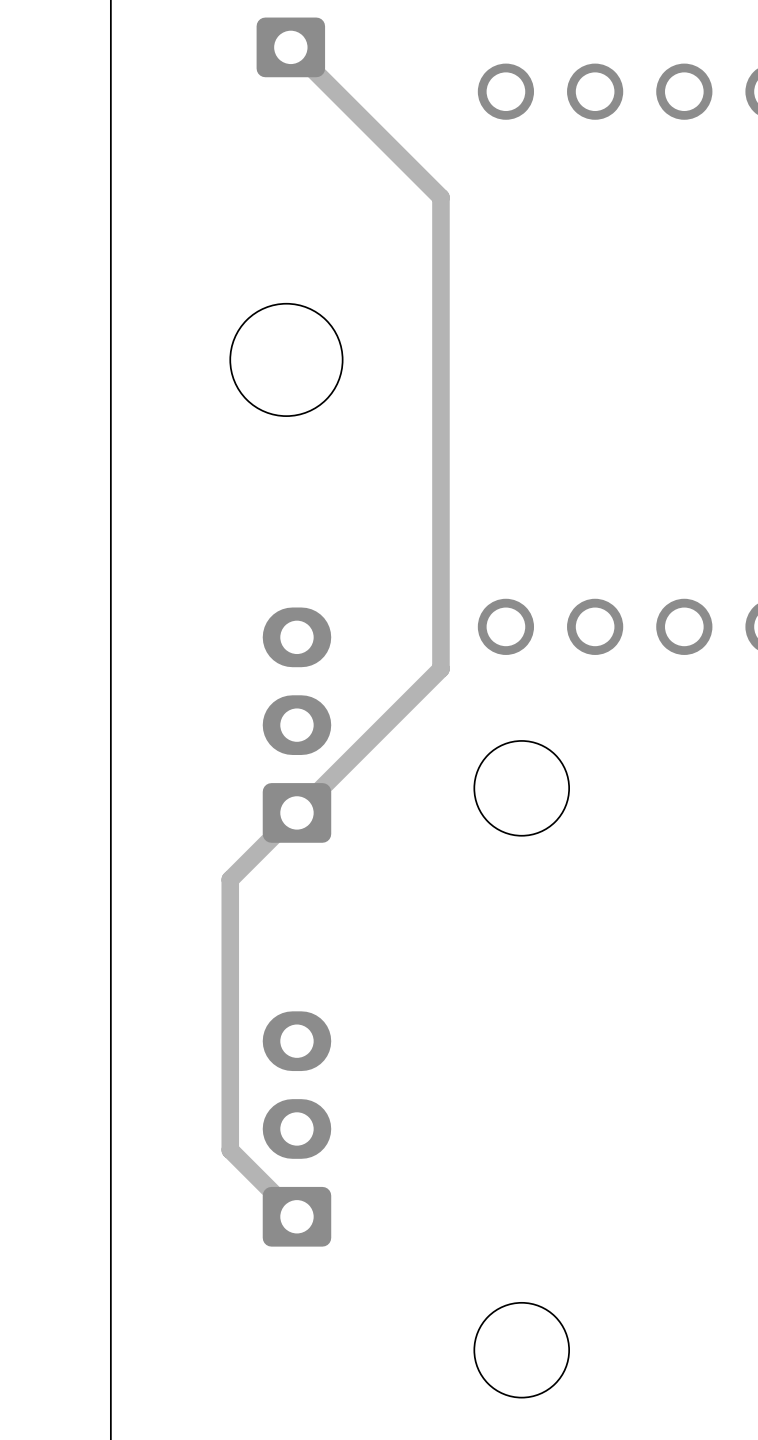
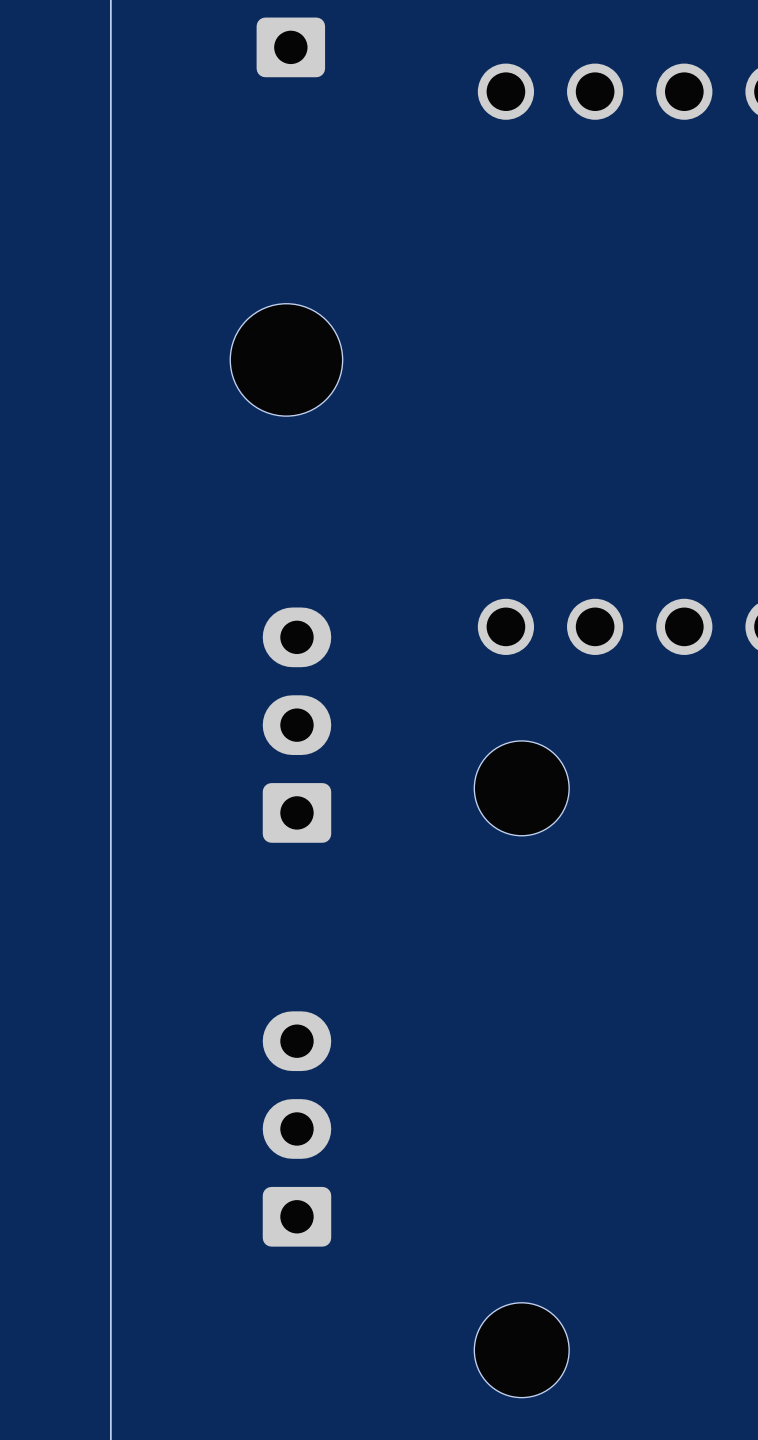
track: (290, 47) (440, 197) (440, 668) (230, 879) (230, 1150) (296, 1216) -> none

